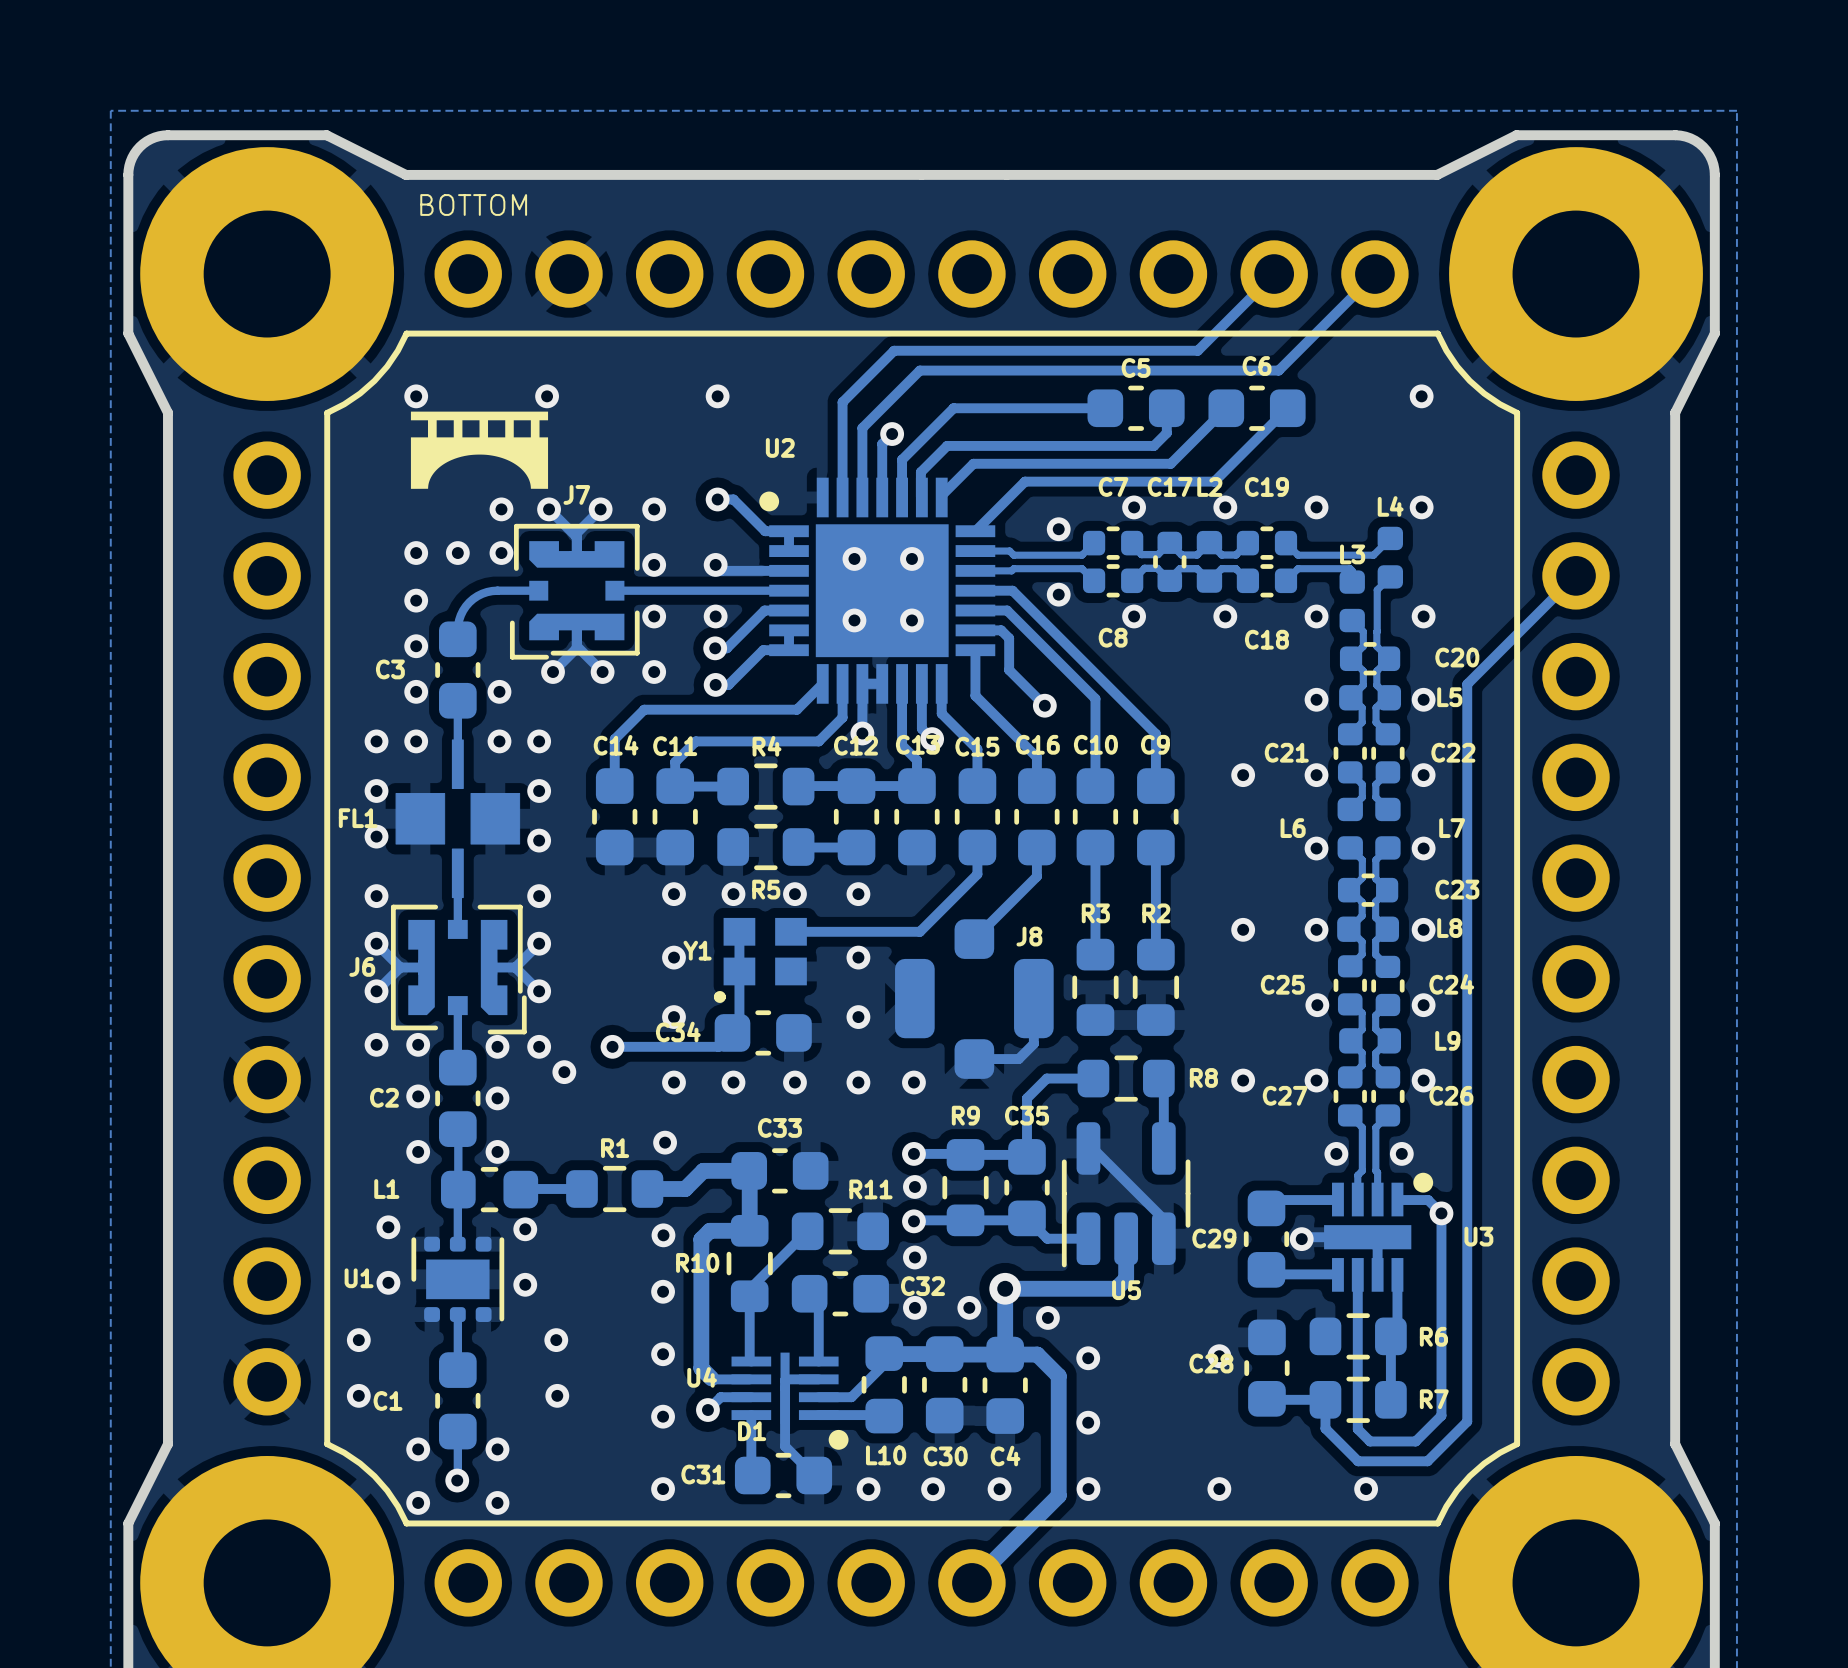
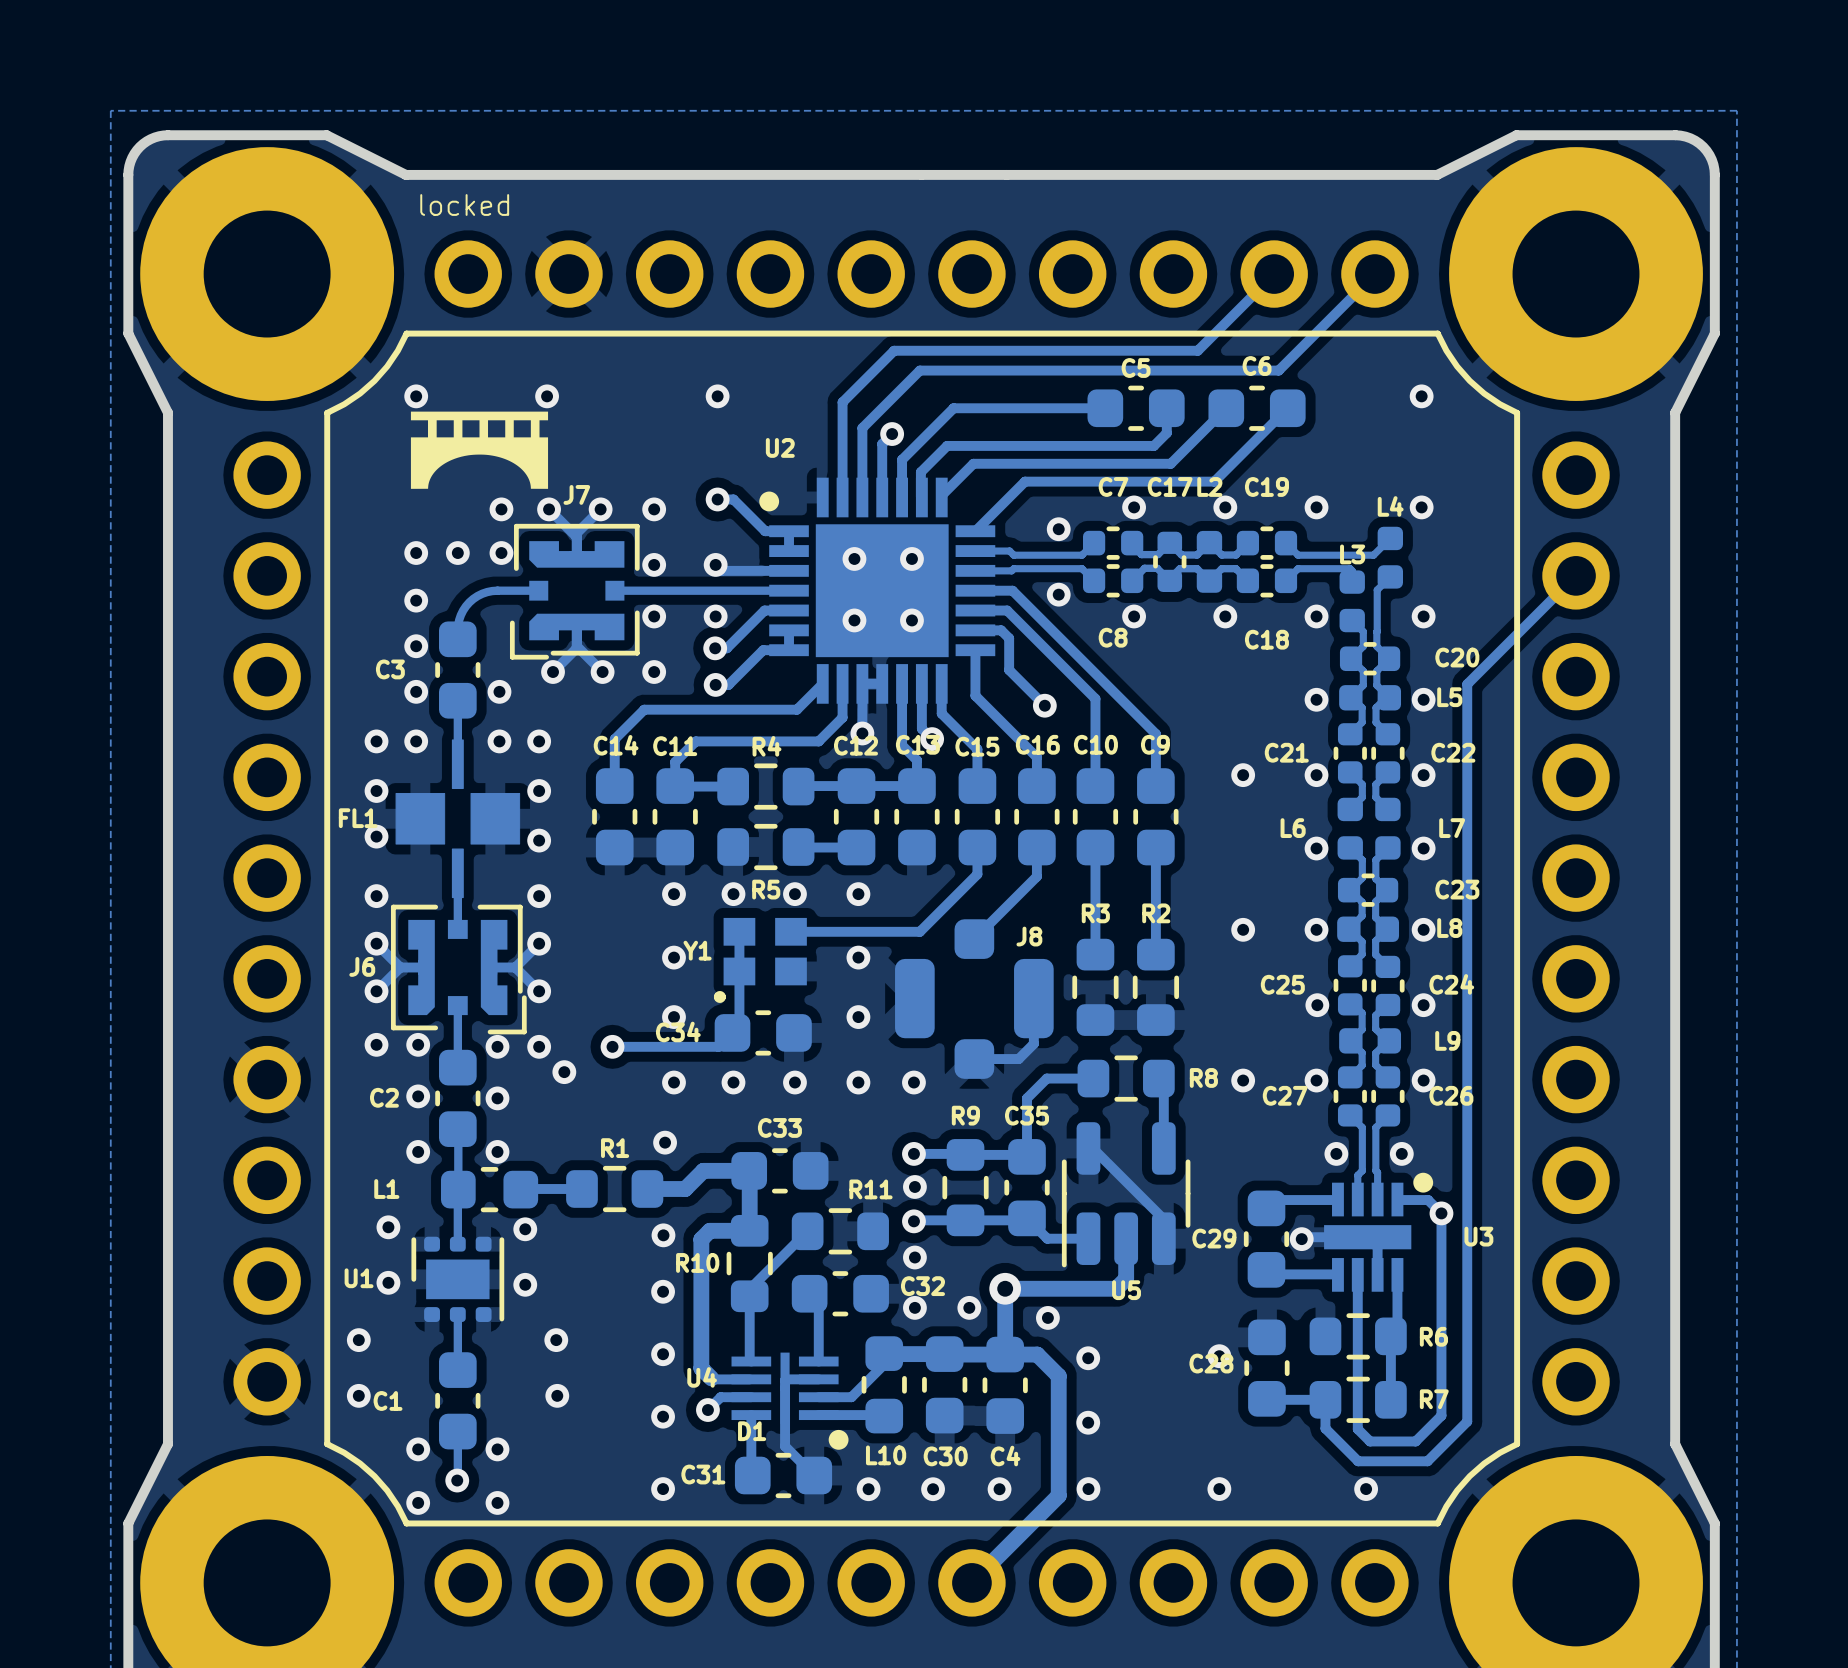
text: BOTTOM (473, 204) -> locked (464, 204)

